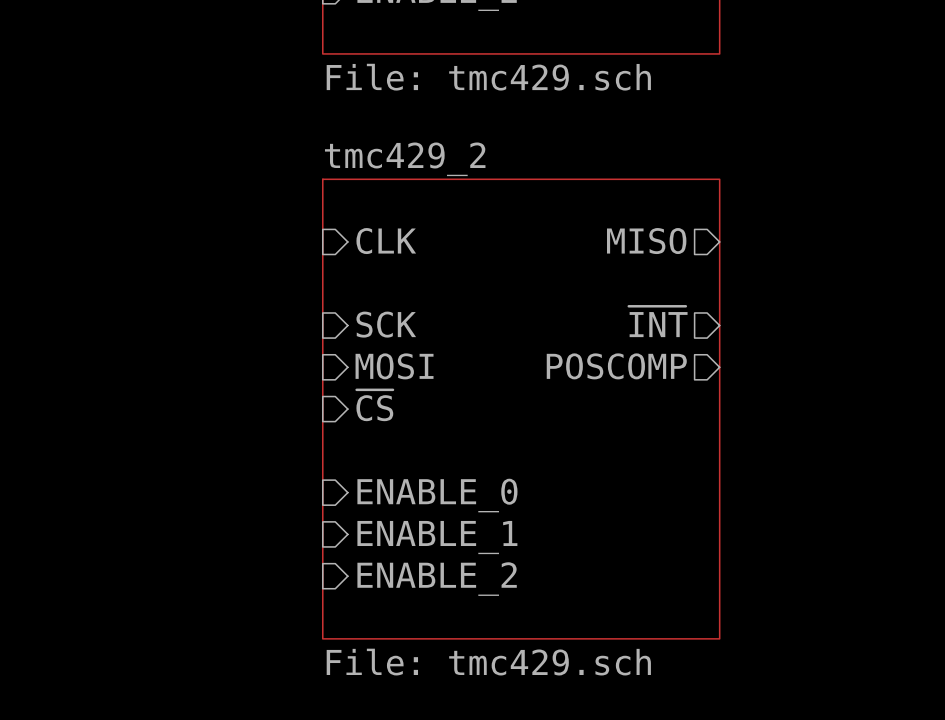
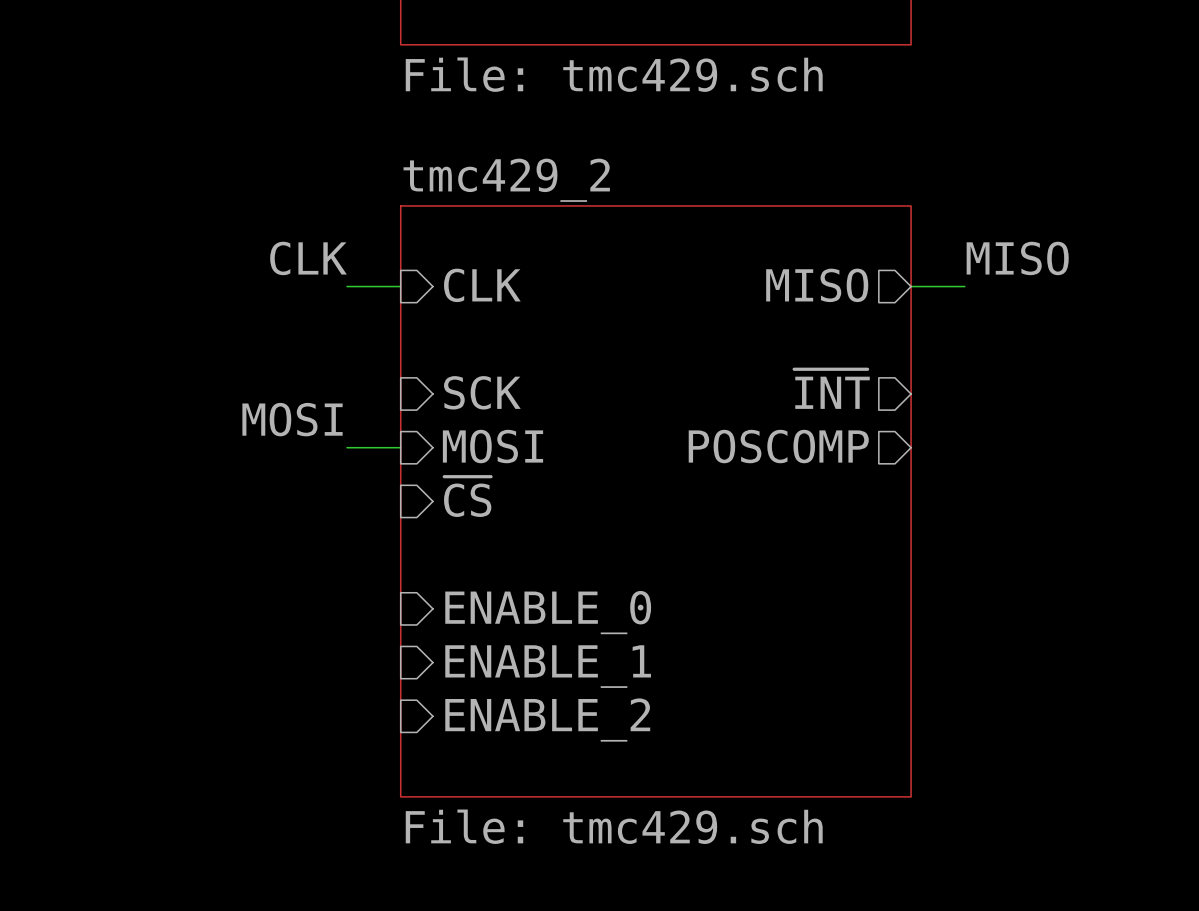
label: none -> CLK (308, 258)
label: none -> MISO (1017, 258)
wire: none -> (347, 286) (400, 286)
wire: none -> (911, 286) (964, 286)
label: none -> MOSI (292, 419)
wire: none -> (347, 447) (400, 447)

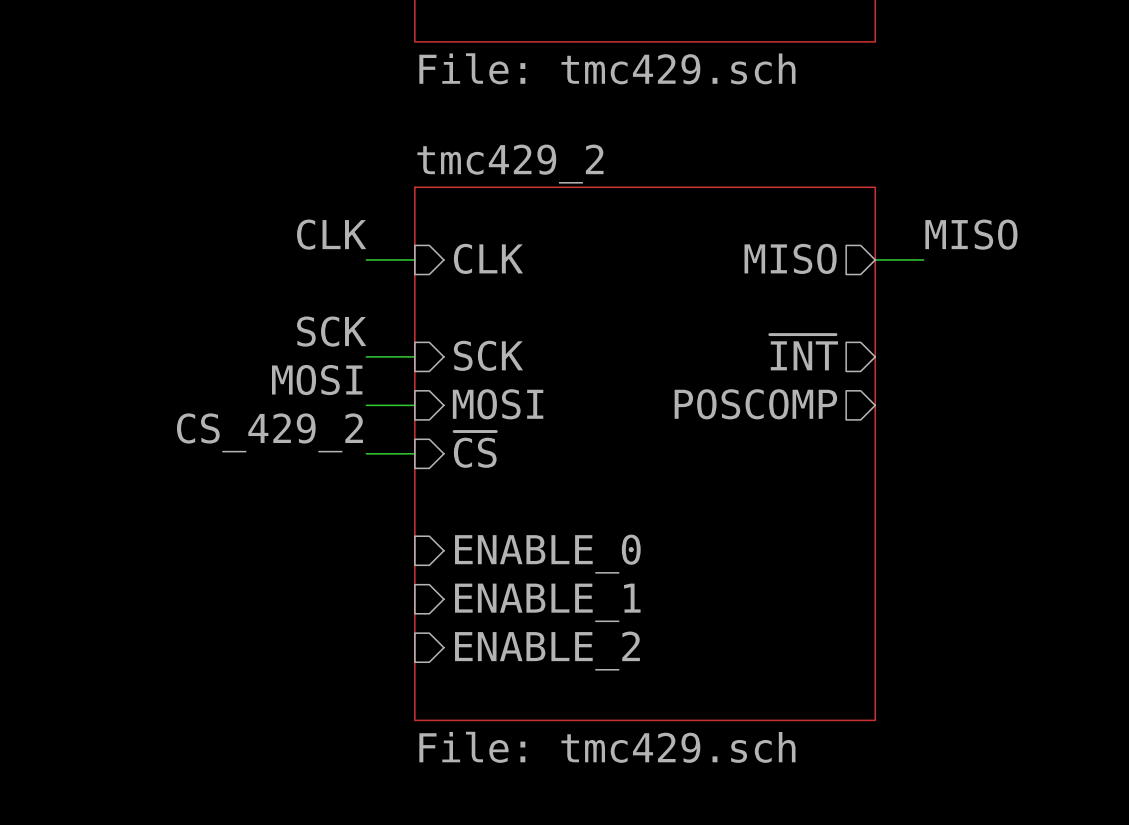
label: none -> SCK (331, 331)
wire: none -> (366, 356) (414, 356)
label: none -> CS_429_2 (269, 432)
wire: none -> (366, 453) (414, 453)

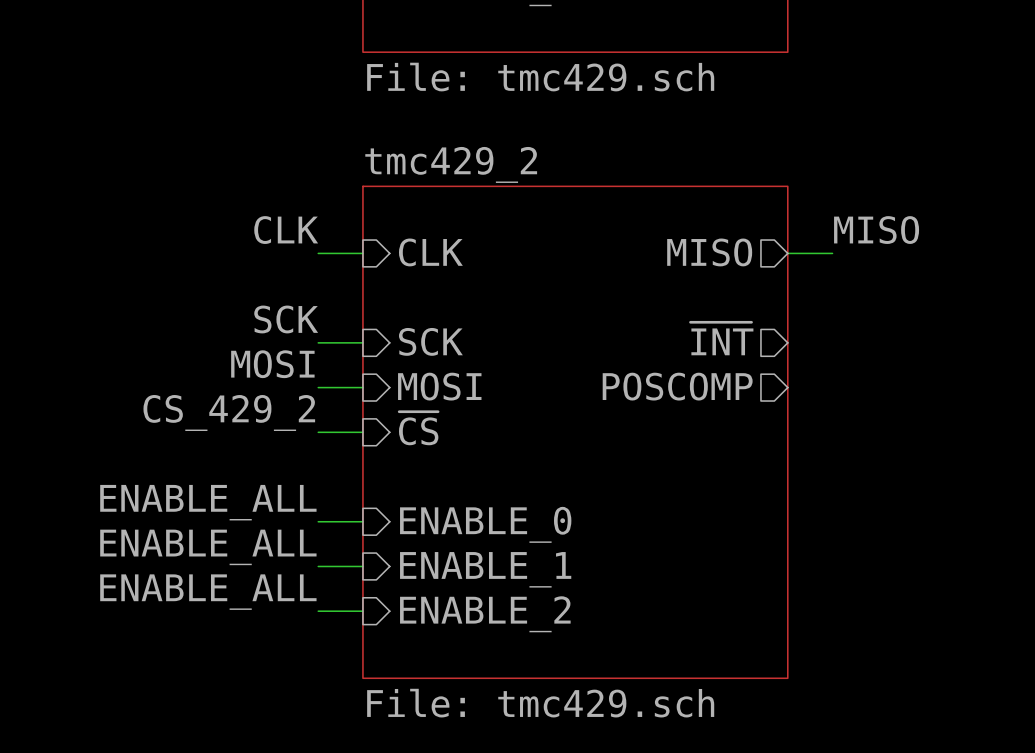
label: none -> ENABLE_ALL (208, 502)
wire: none -> (318, 521) (362, 521)
label: none -> ENABLE_ALL (208, 547)
wire: none -> (318, 566) (362, 566)
label: none -> ENABLE_ALL (208, 592)
wire: none -> (318, 611) (362, 611)

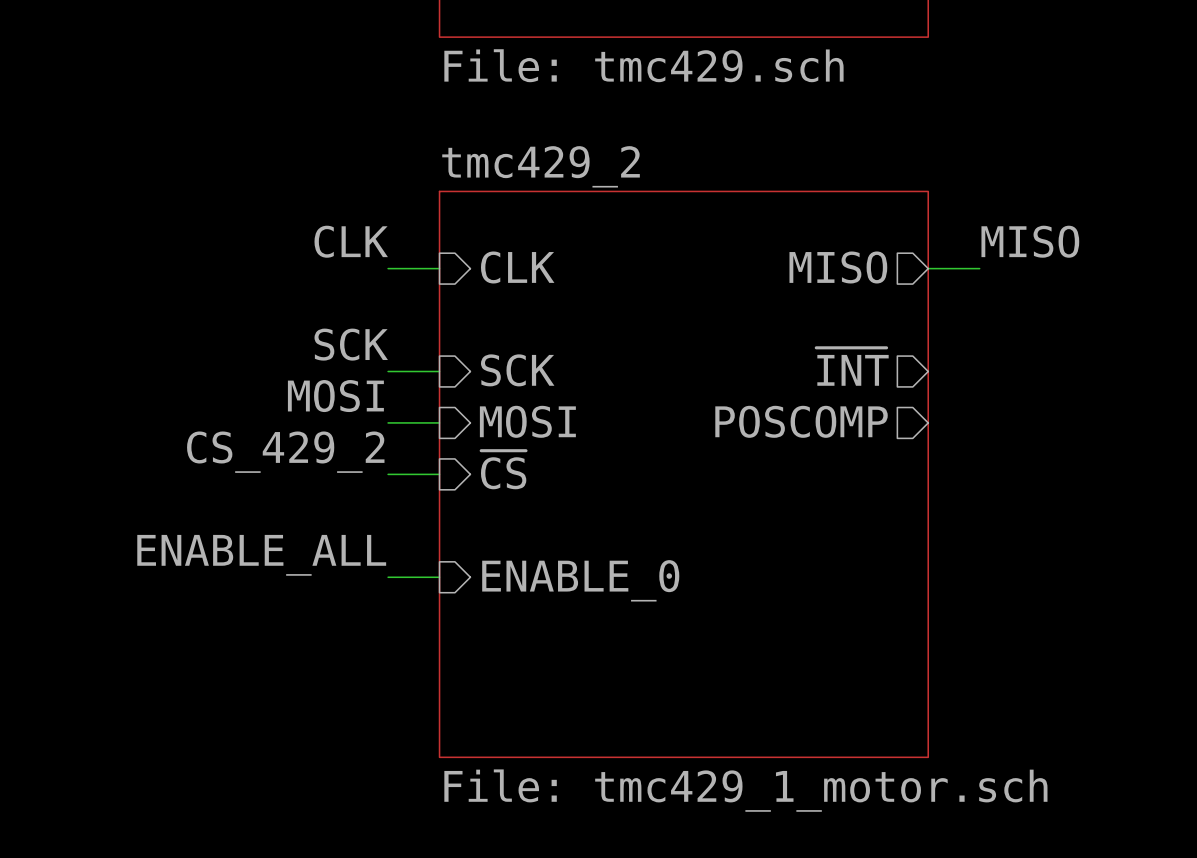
label: ENABLE_ALL (208, 547) -> none
wire: (318, 566) (362, 566) -> none
sheet pin: ENABLE_1 (485, 569) -> none
label: ENABLE_ALL (208, 592) -> none
wire: (318, 611) (362, 611) -> none
sheet pin: ENABLE_2 (485, 614) -> none
sheet tmc429_2 value: File: tmc429.sch (540, 703) -> File: tmc429_1_motor.sch (745, 790)

